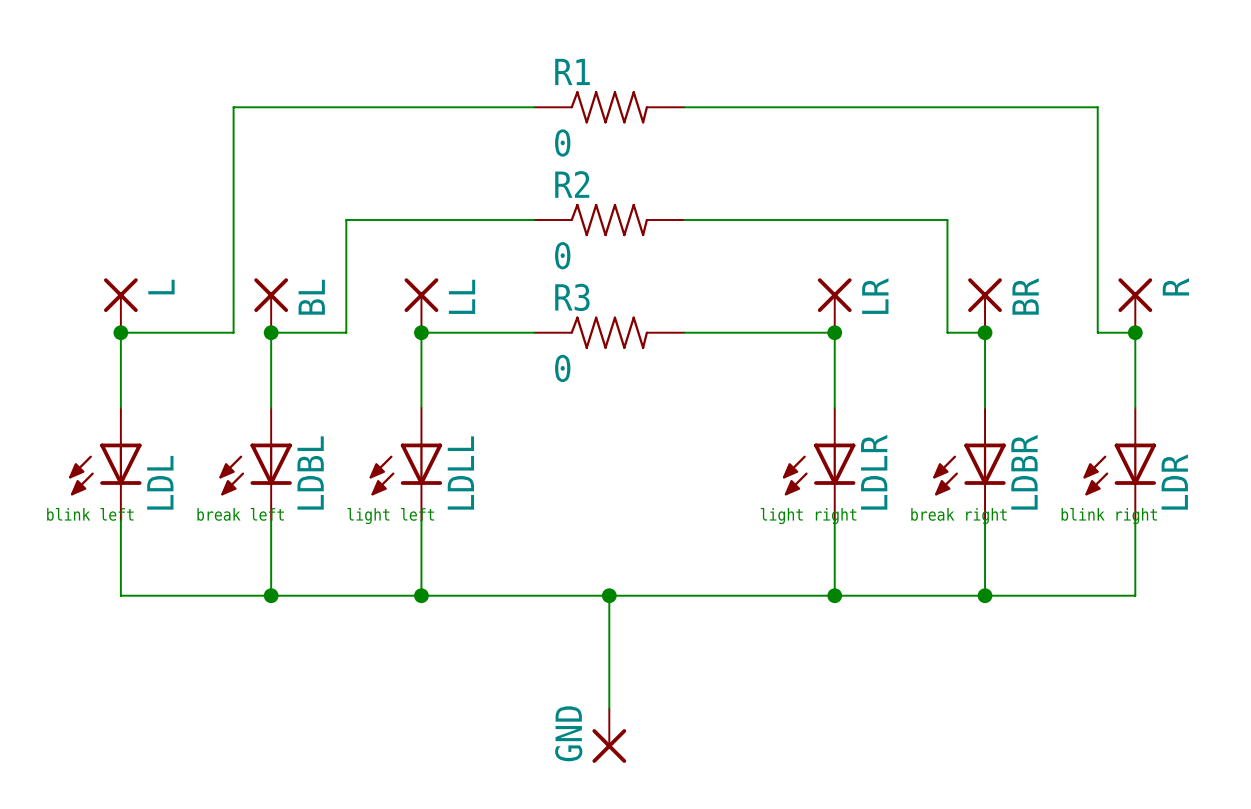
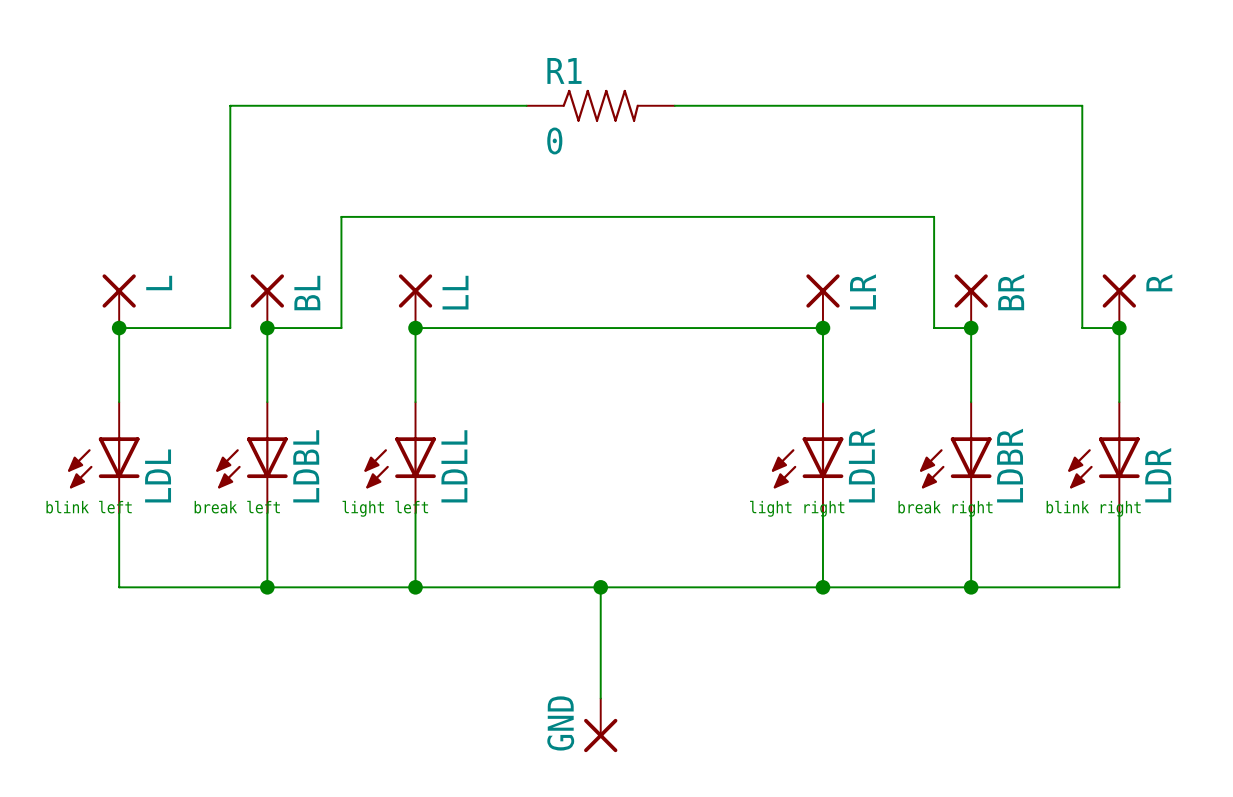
R2: 0 (609, 220) -> none
R3: 0 (609, 332) -> none

